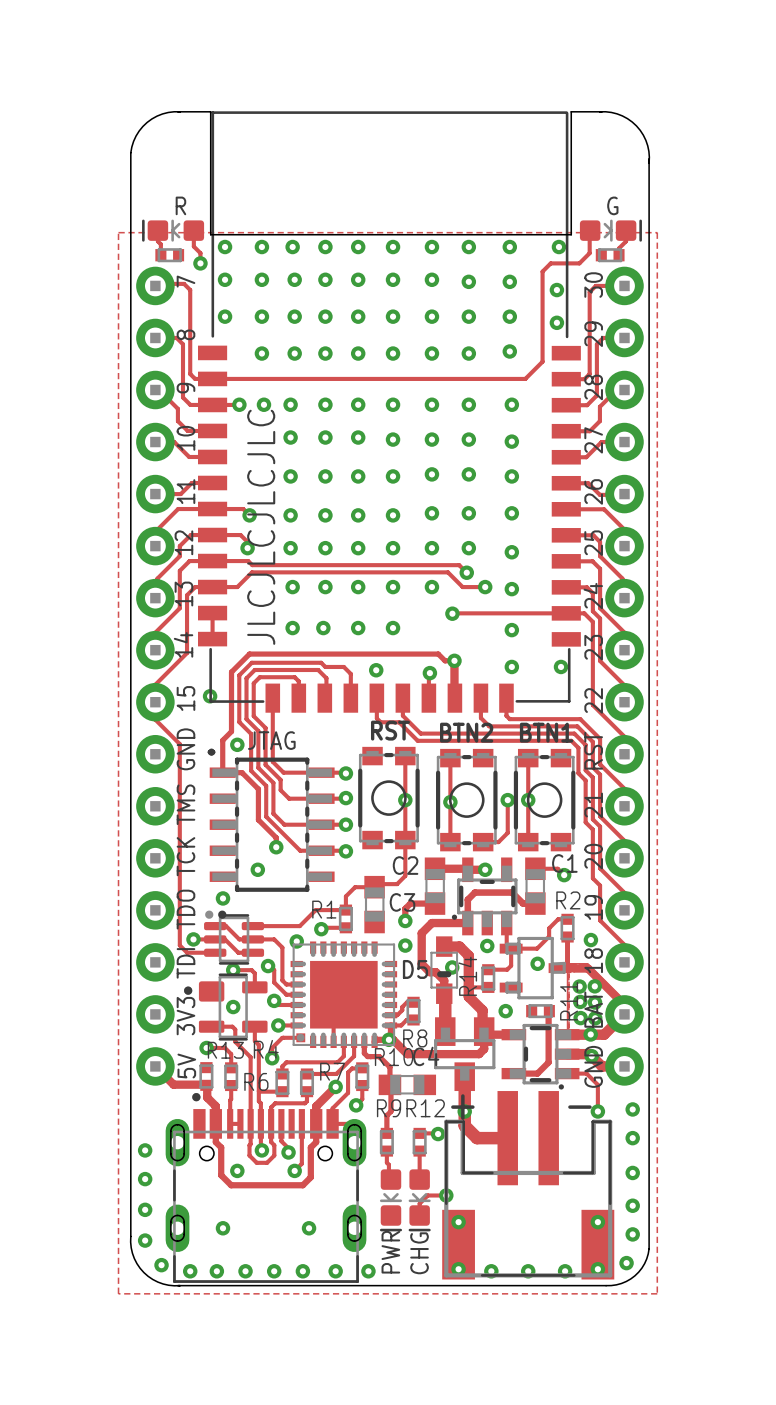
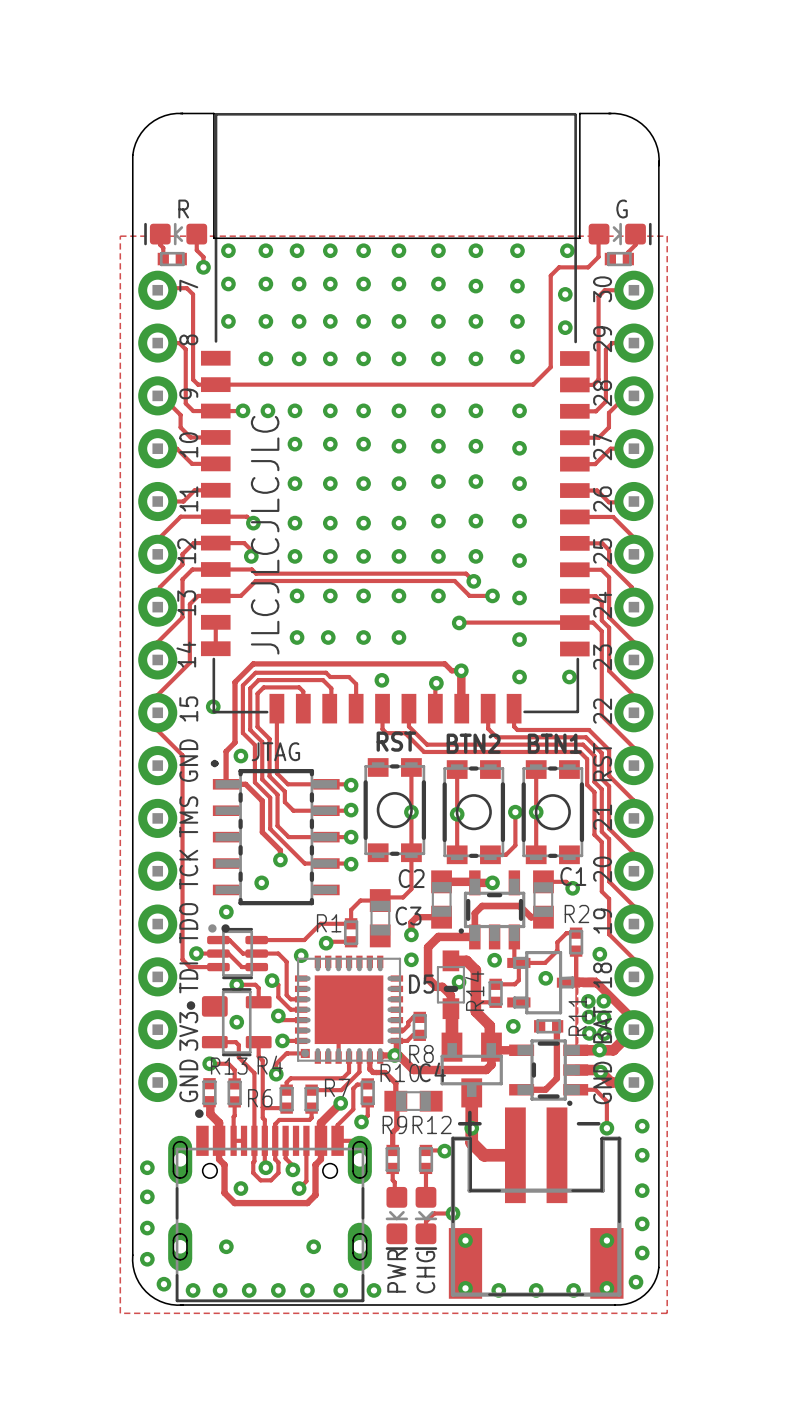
track: (155, 1066) (173, 1084) (206, 1085) -> none
text: 5V (186, 1066) -> GND (188, 1080)

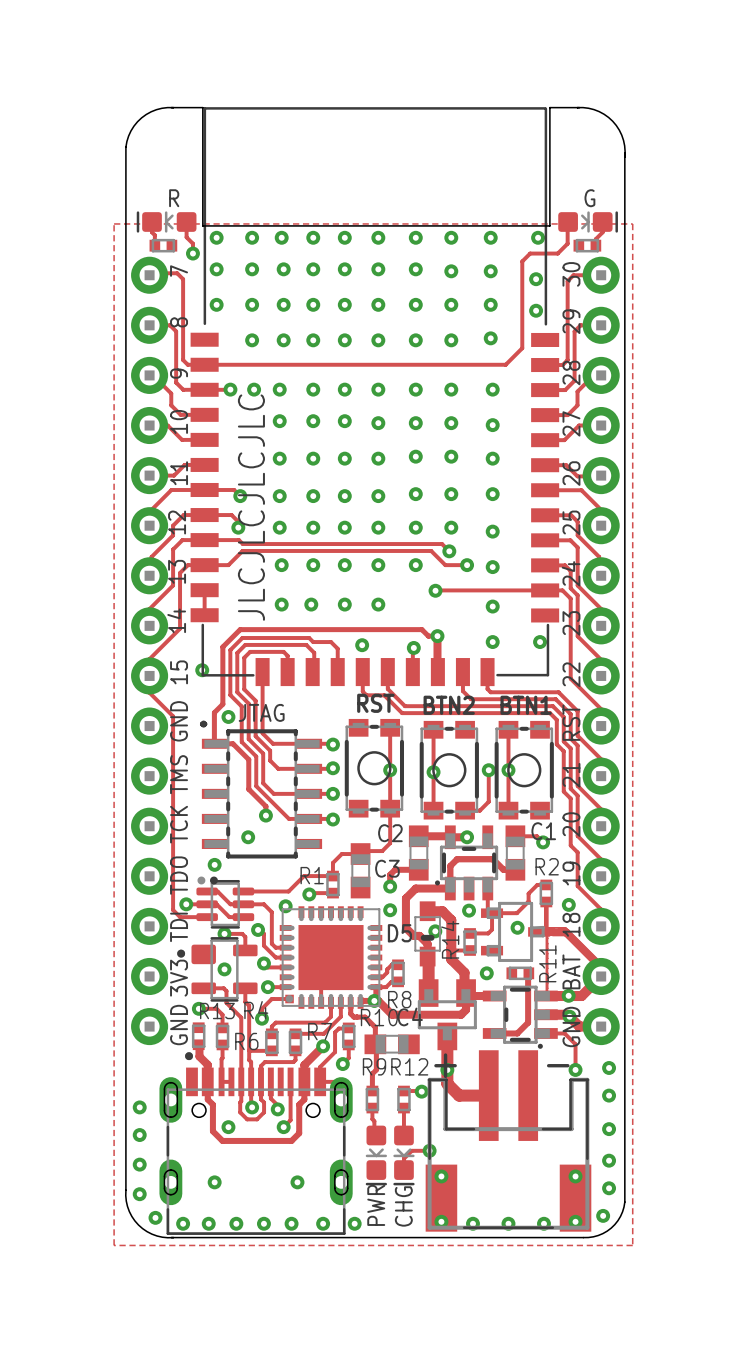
via: (588, 1001) -> none
via: (603, 1001) -> none
via: (589, 1017) -> none
via: (603, 1017) -> none
via: (589, 1033) -> none
via: (604, 1033) -> none

